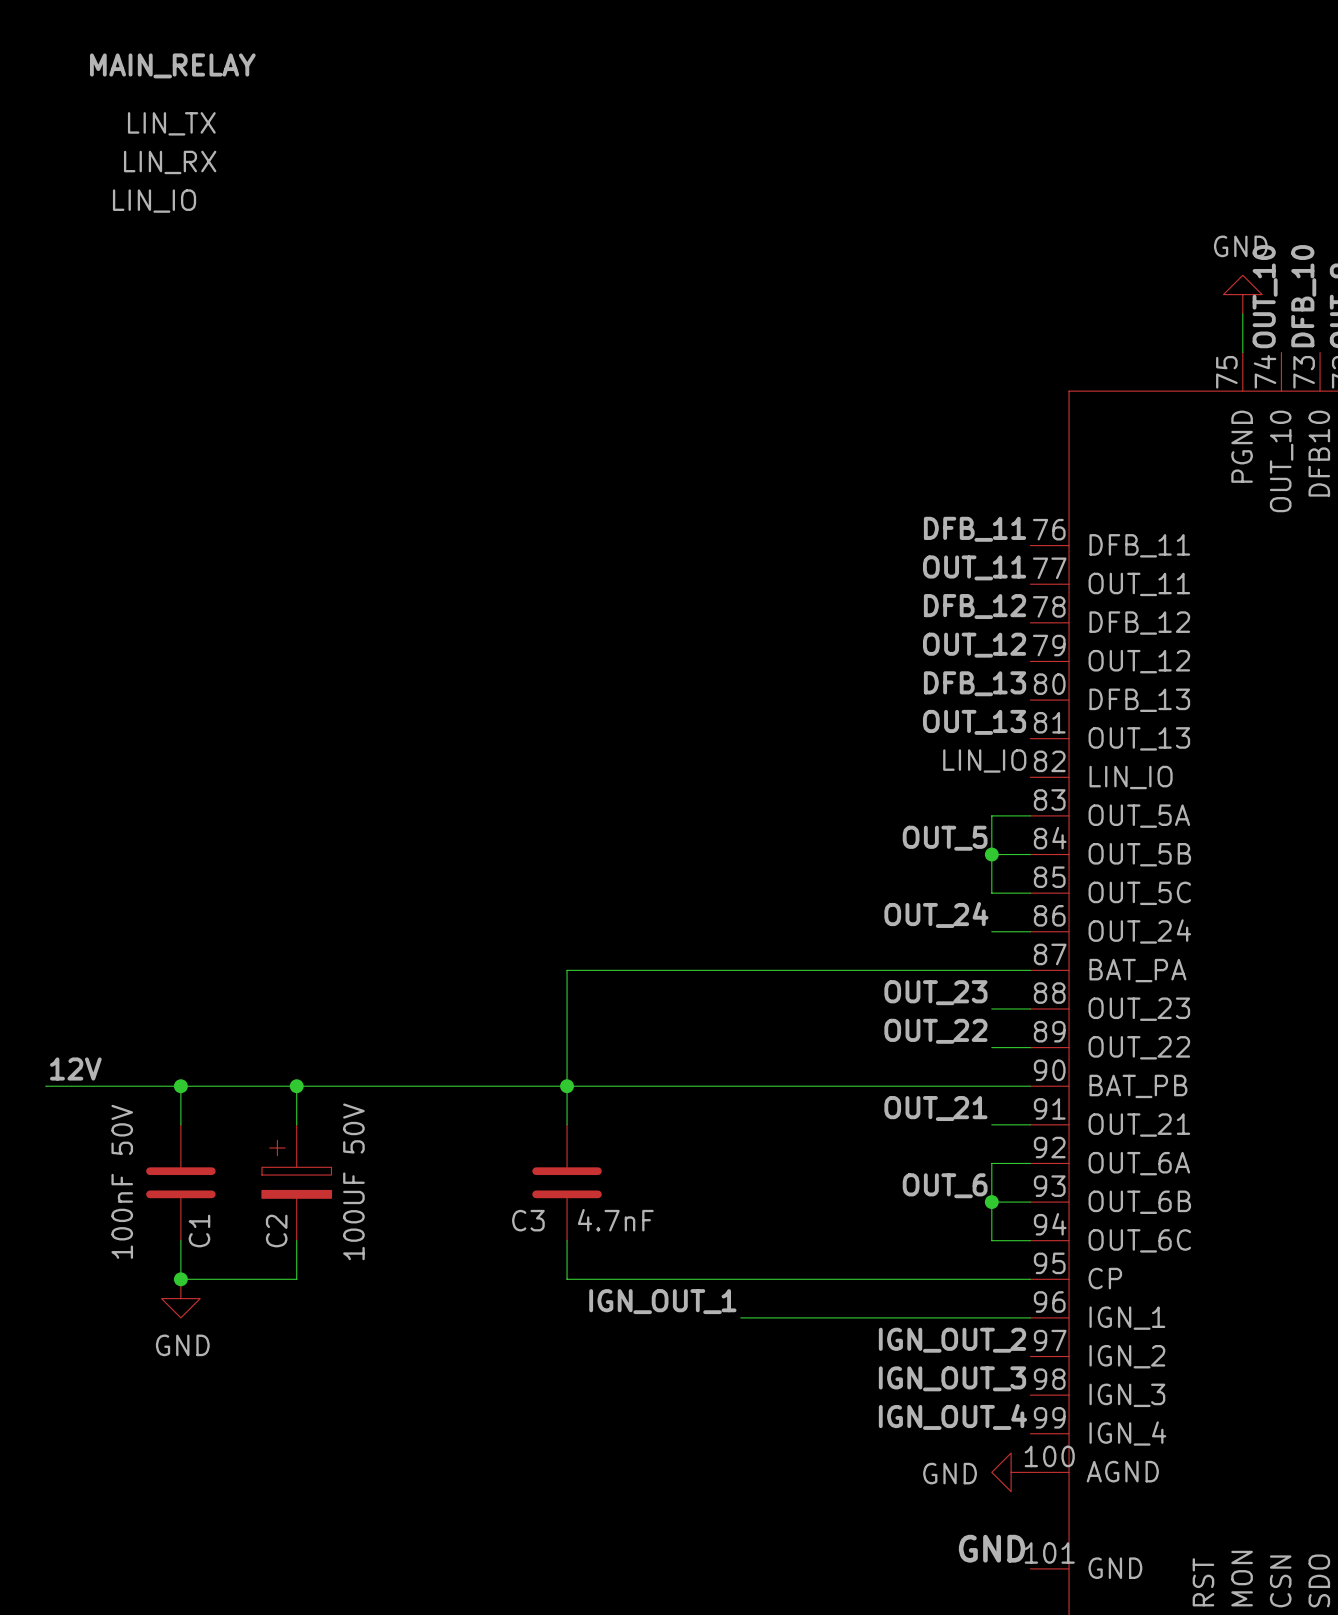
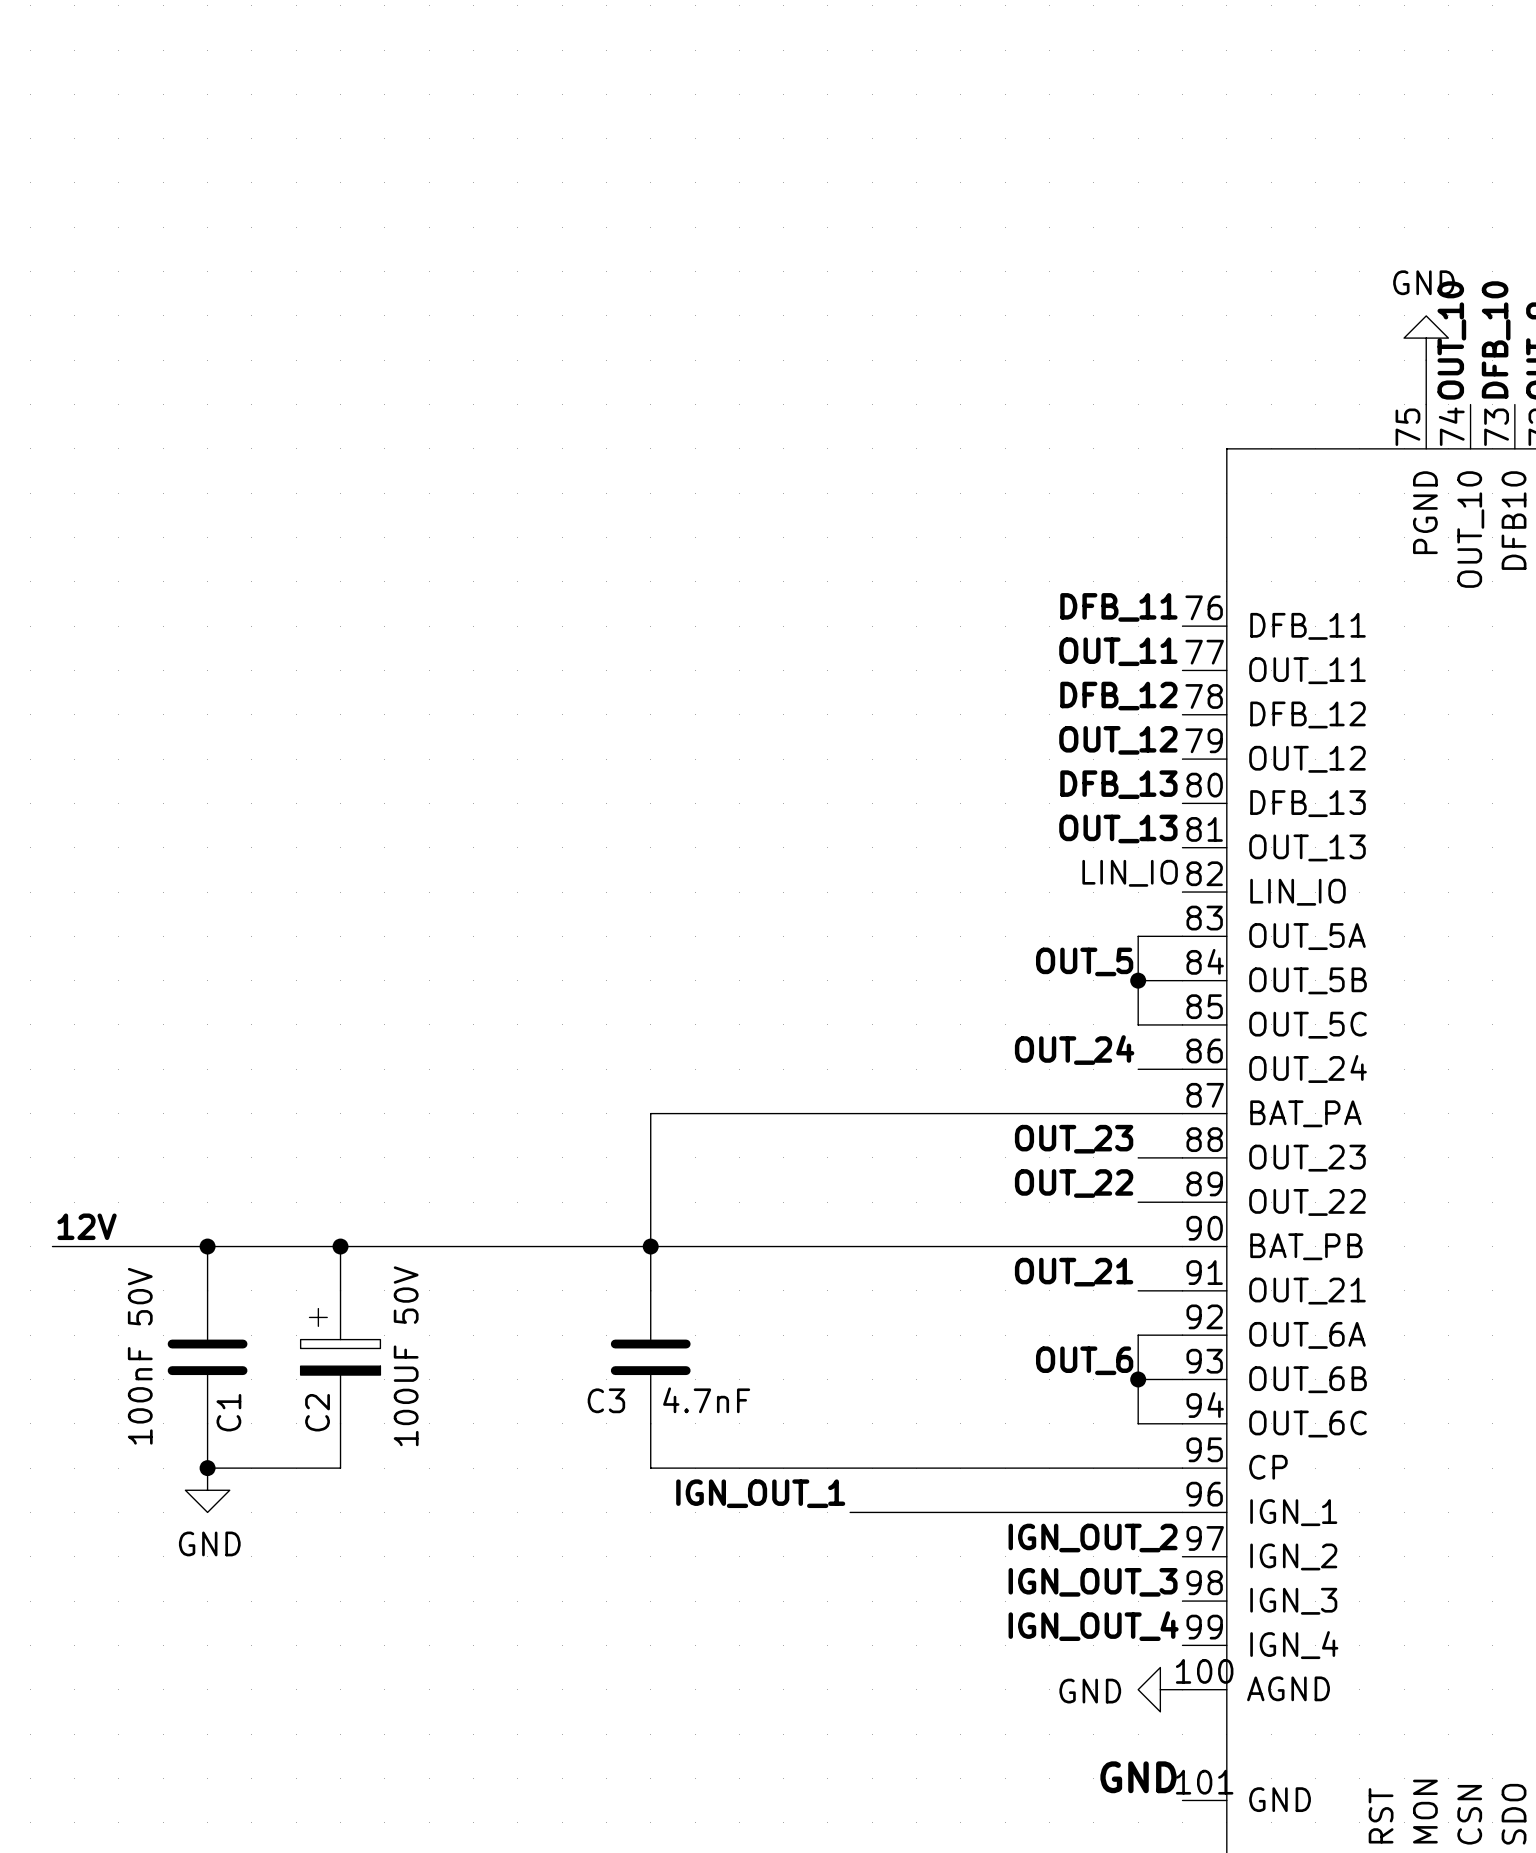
label: MAIN_RELAY (172, 65) -> none
label: LIN_TX (171, 123) -> none
label: LIN_RX (170, 162) -> none
label: LIN_IO (154, 201) -> none

